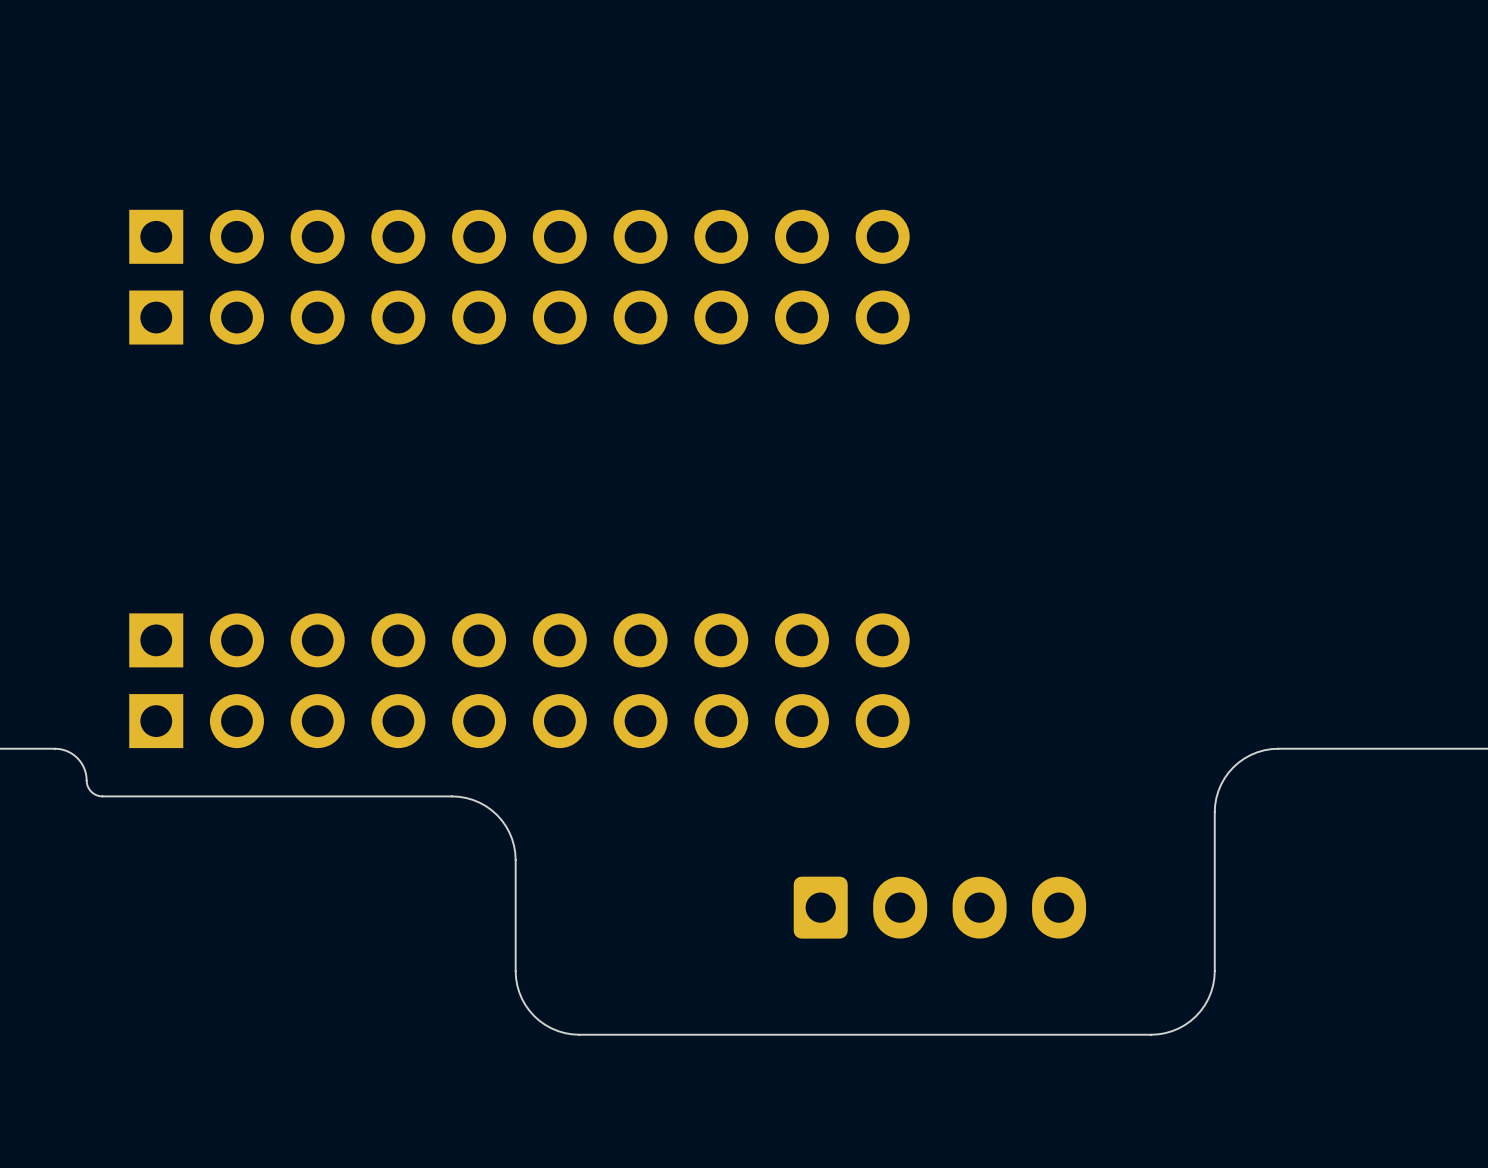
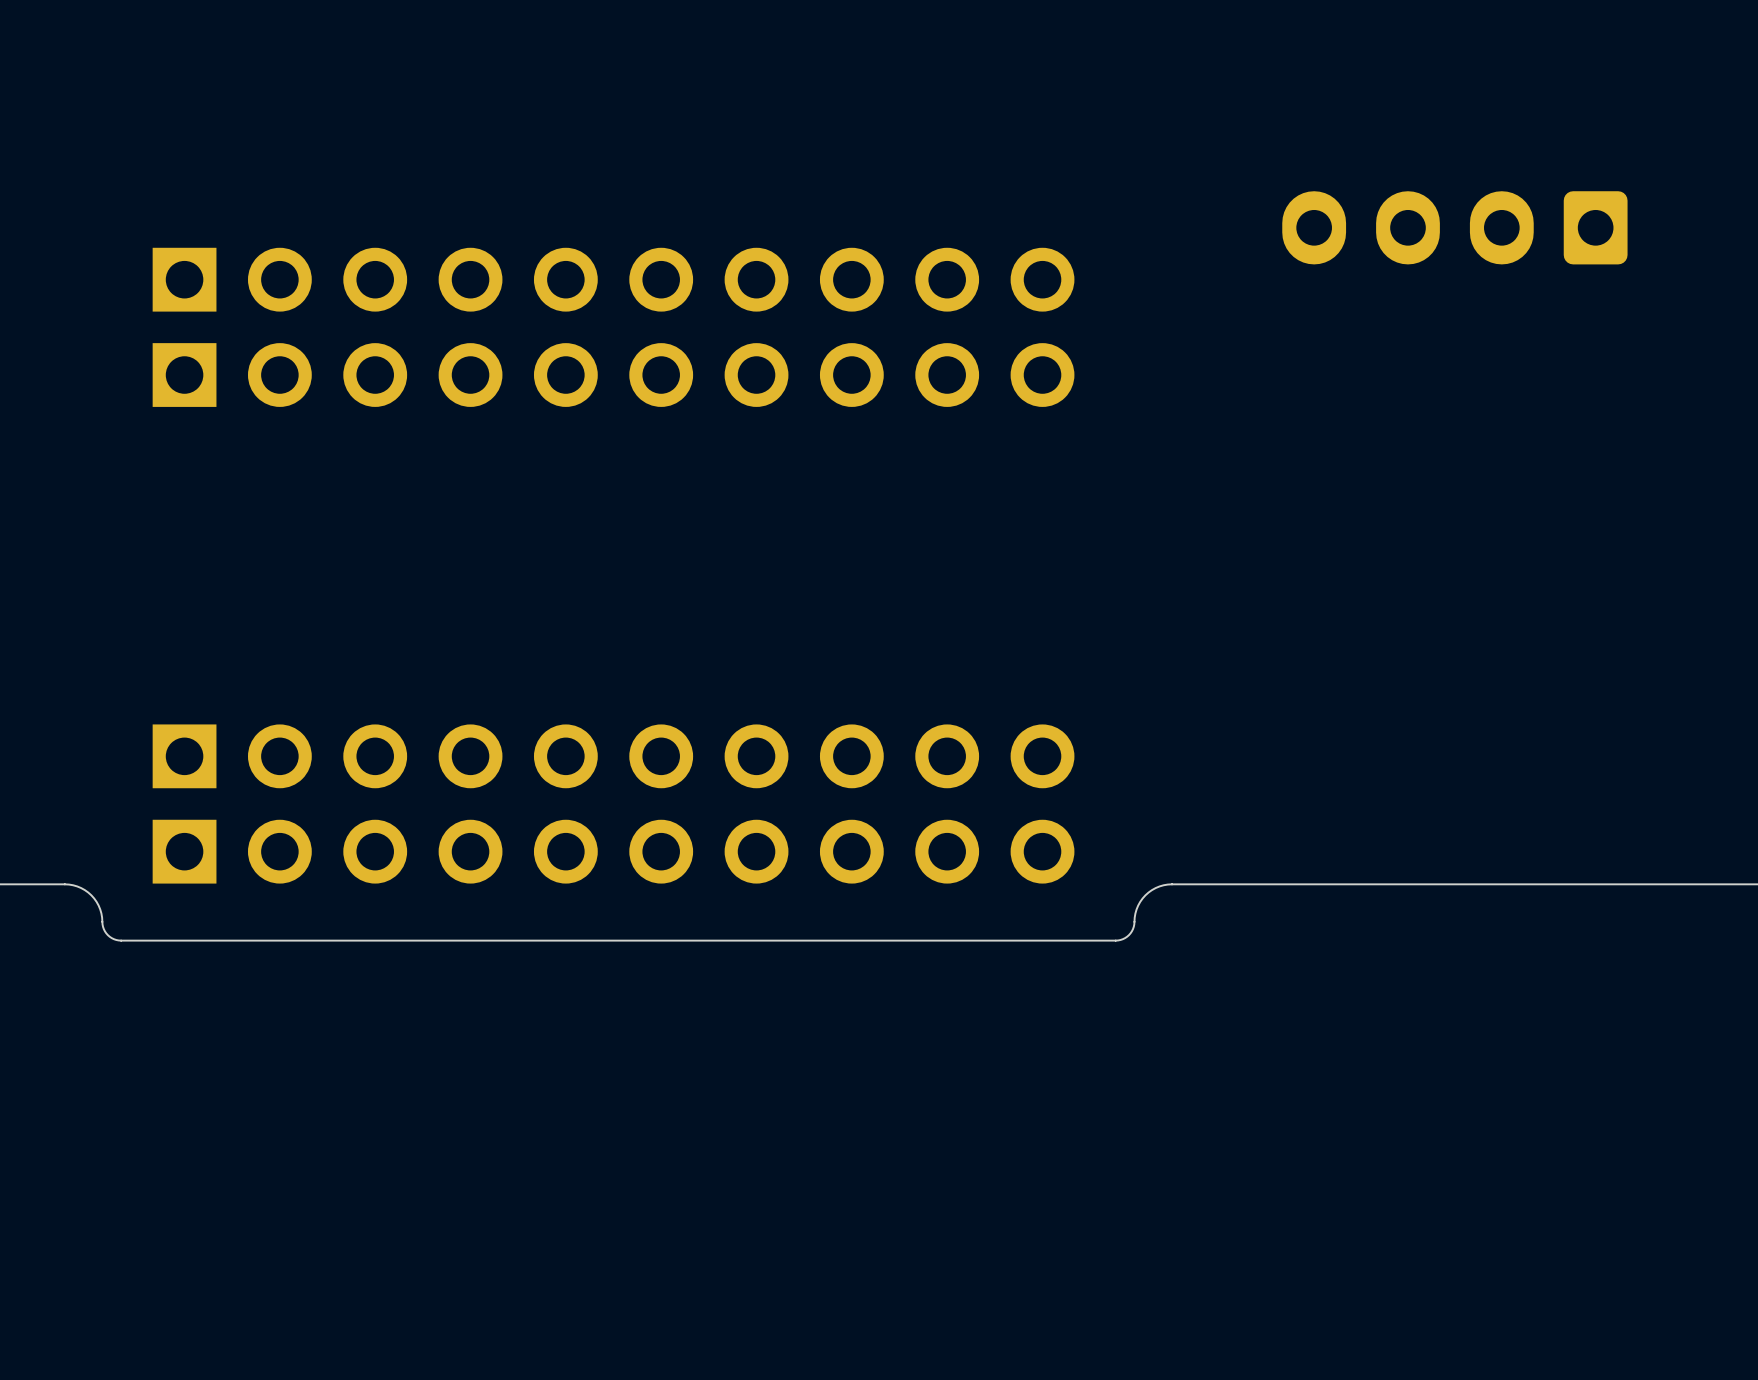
board edge: (1278, 748) (1257, 752) (1244, 758) (1228, 772) (1221, 784) (1216, 798) (1214, 812) (1213, 985) (1205, 1005) (1196, 1016) (1178, 1028) (1158, 1034) (579, 1034) (558, 1031) (545, 1025) (534, 1016) (521, 998) (517, 985) (515, 859) (514, 845) (509, 832) (501, 820) (485, 806) (473, 799) (452, 796) -> (1509, 884) (1167, 884) (1155, 888) (1145, 895) (1136, 909) (1131, 931) (1125, 938) (1115, 940) (533, 940)
part rotation: 0° (939, 907) -> 180° (1454, 227)
part position: (939, 907) -> (1454, 227)

